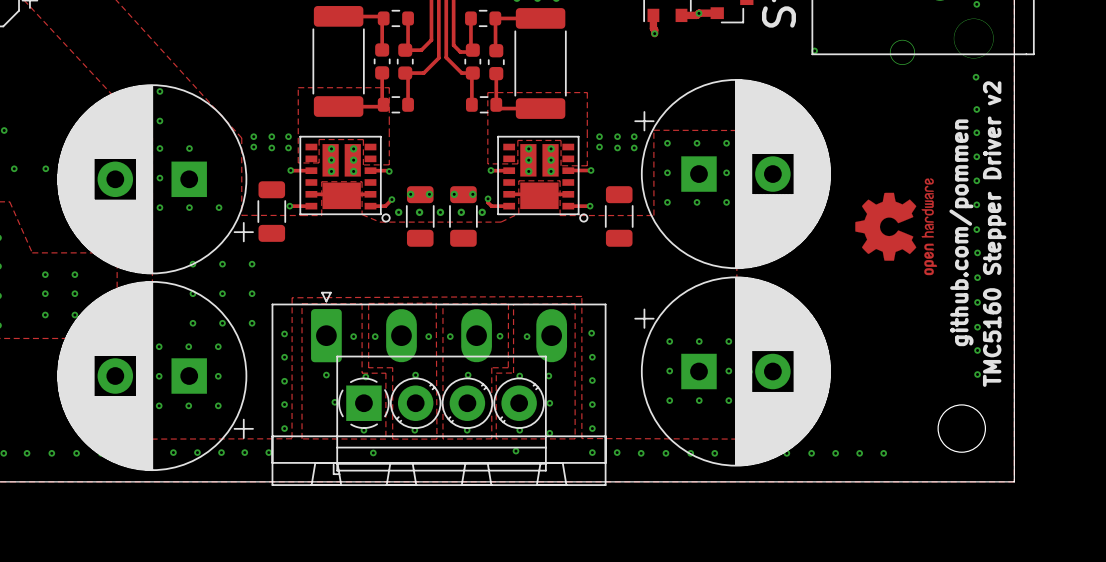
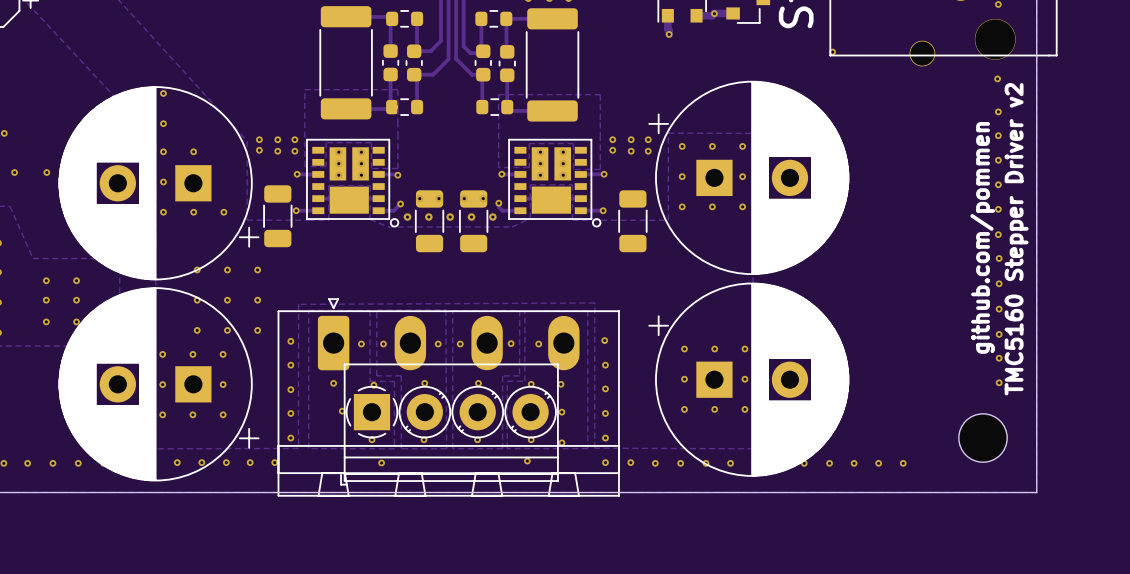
drawing: [855, 178, 938, 276] -> none

